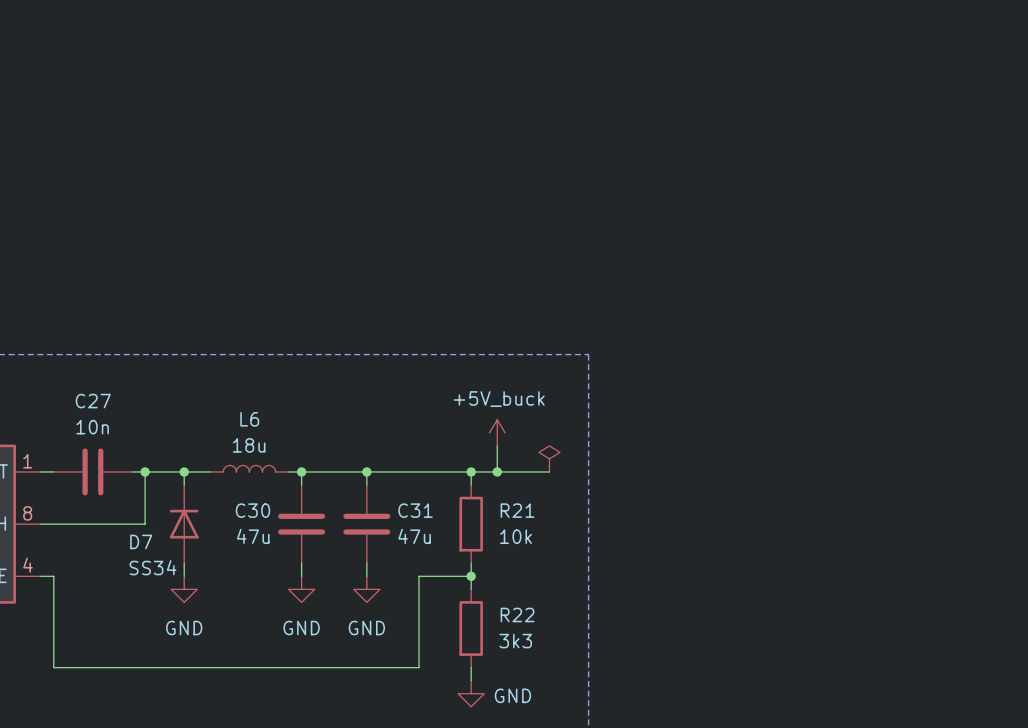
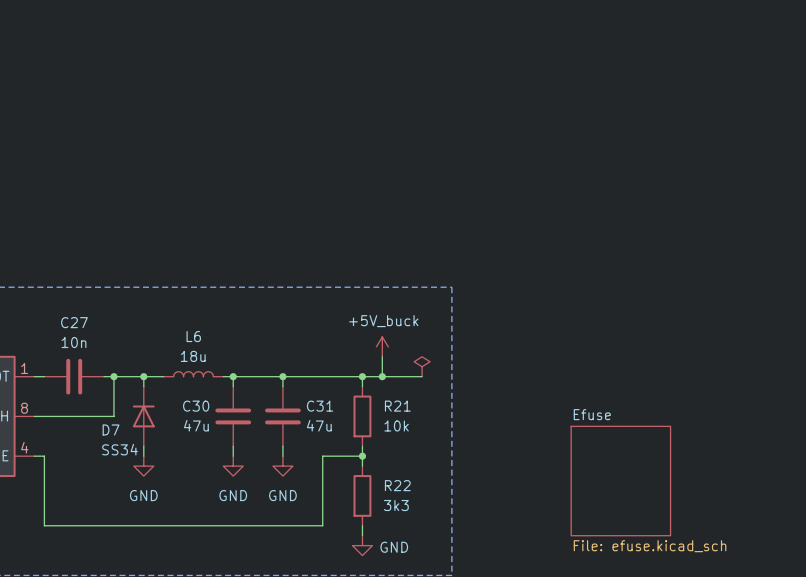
sheet Efuse: none -> File: efuse.kicad_sch (620, 481)

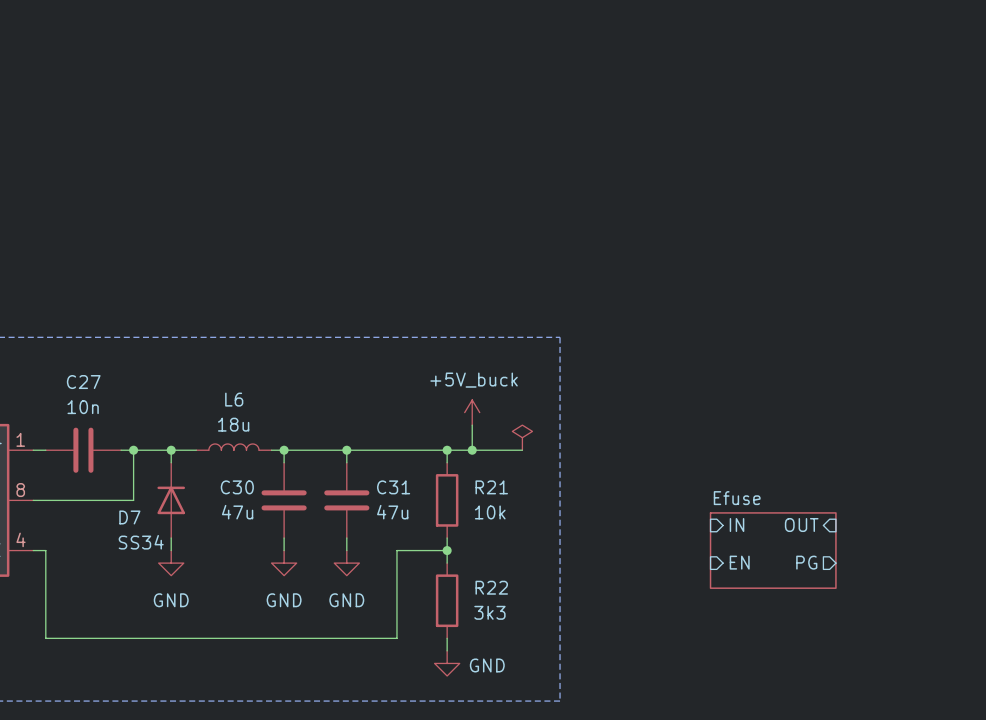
sheet pin: none -> IN (737, 525)
sheet pin: none -> OUT (801, 525)
sheet Efuse: none -> (773, 550)
sheet pin: none -> EN (739, 562)
sheet pin: none -> PG (806, 562)
sheet Efuse: File: efuse.kicad_sch (620, 481) -> none

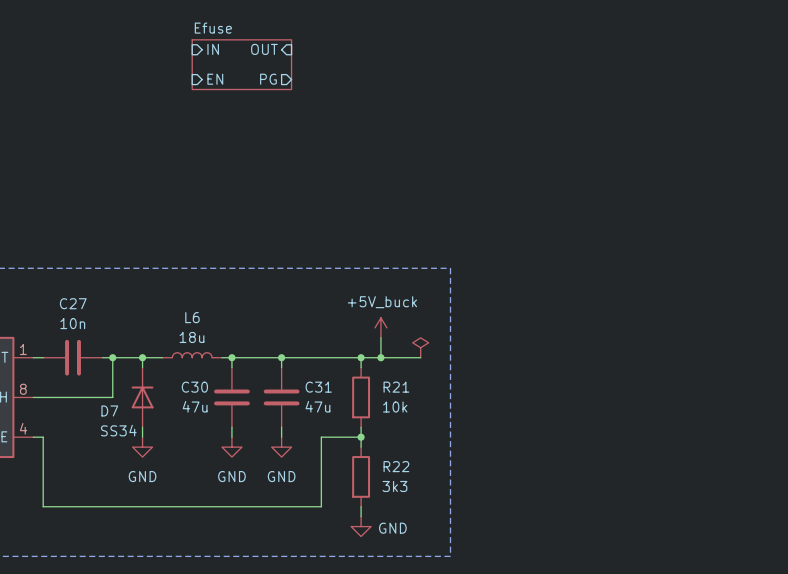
sheet pin: none -> IN (213, 49)
sheet pin: none -> OUT (264, 49)
sheet Efuse: none -> (241, 64)
sheet pin: none -> EN (215, 79)
sheet pin: none -> PG (268, 79)
sheet pin: IN (737, 525) -> none
sheet pin: OUT (801, 525) -> none
sheet Efuse: (773, 550) -> none
sheet pin: EN (739, 562) -> none
sheet pin: PG (806, 562) -> none

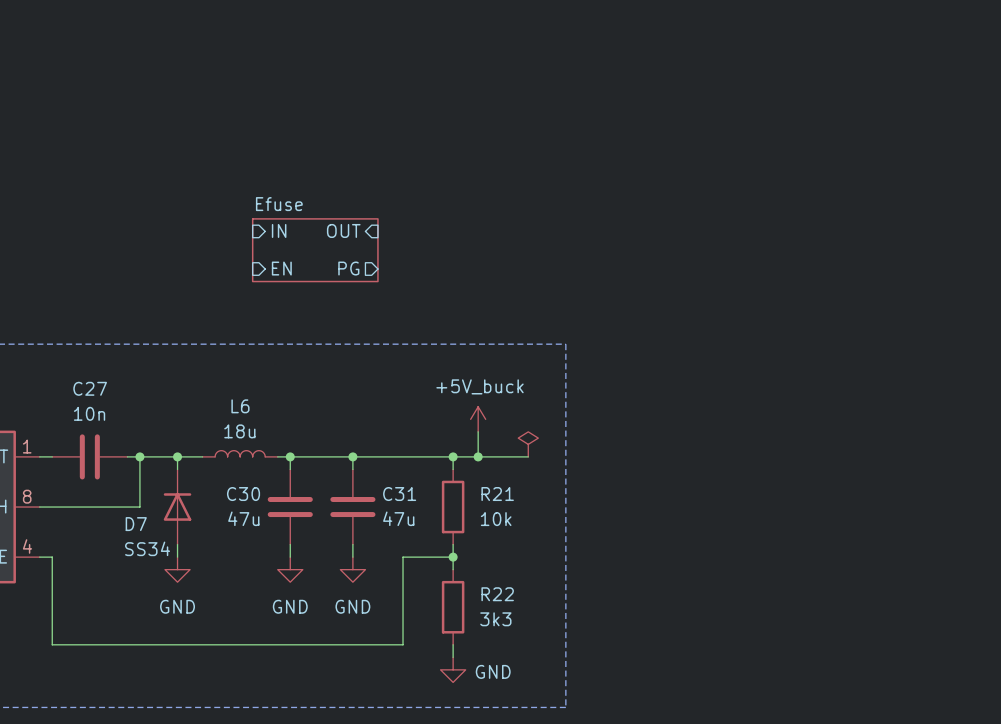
sheet pin position: IN (213, 49) -> IN (279, 230)
sheet pin position: OUT (264, 49) -> OUT (343, 230)
sheet Efuse position: (241, 64) -> (315, 250)
sheet pin position: EN (215, 79) -> EN (281, 268)
sheet pin position: PG (268, 79) -> PG (348, 268)

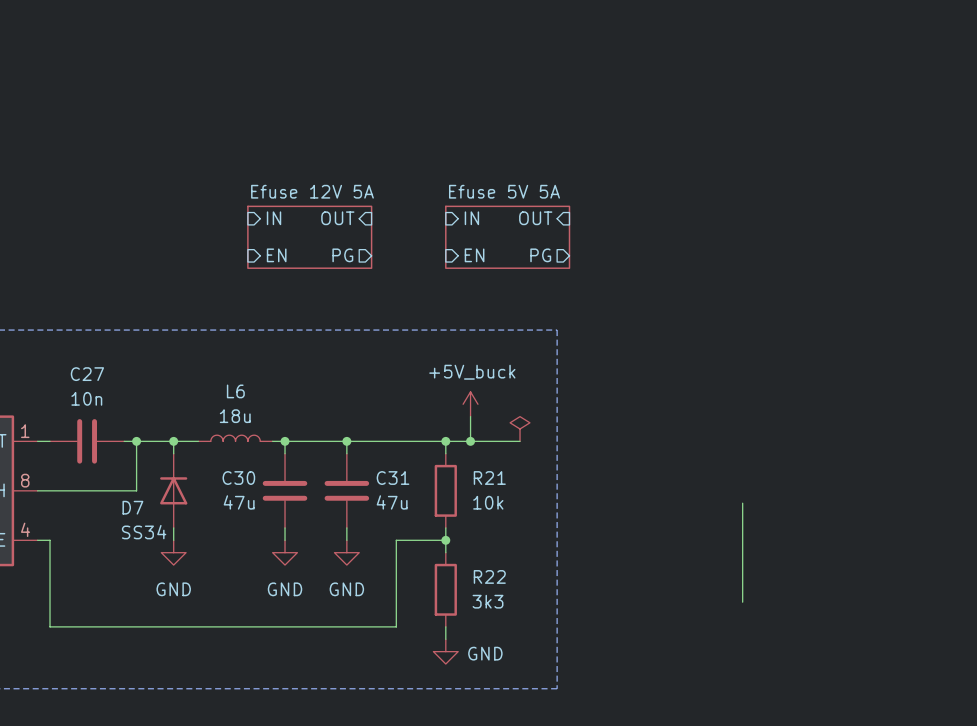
sheet Efuse name: Efuse (279, 204) -> Efuse 12V 5A (312, 191)
sheet pin: none -> IN (471, 218)
sheet pin: none -> OUT (535, 218)
sheet Efuse 5V 5A: none -> (507, 237)
sheet pin: none -> EN (474, 255)
sheet pin: none -> PG (540, 255)
wire: none -> (742, 503) (742, 602)

